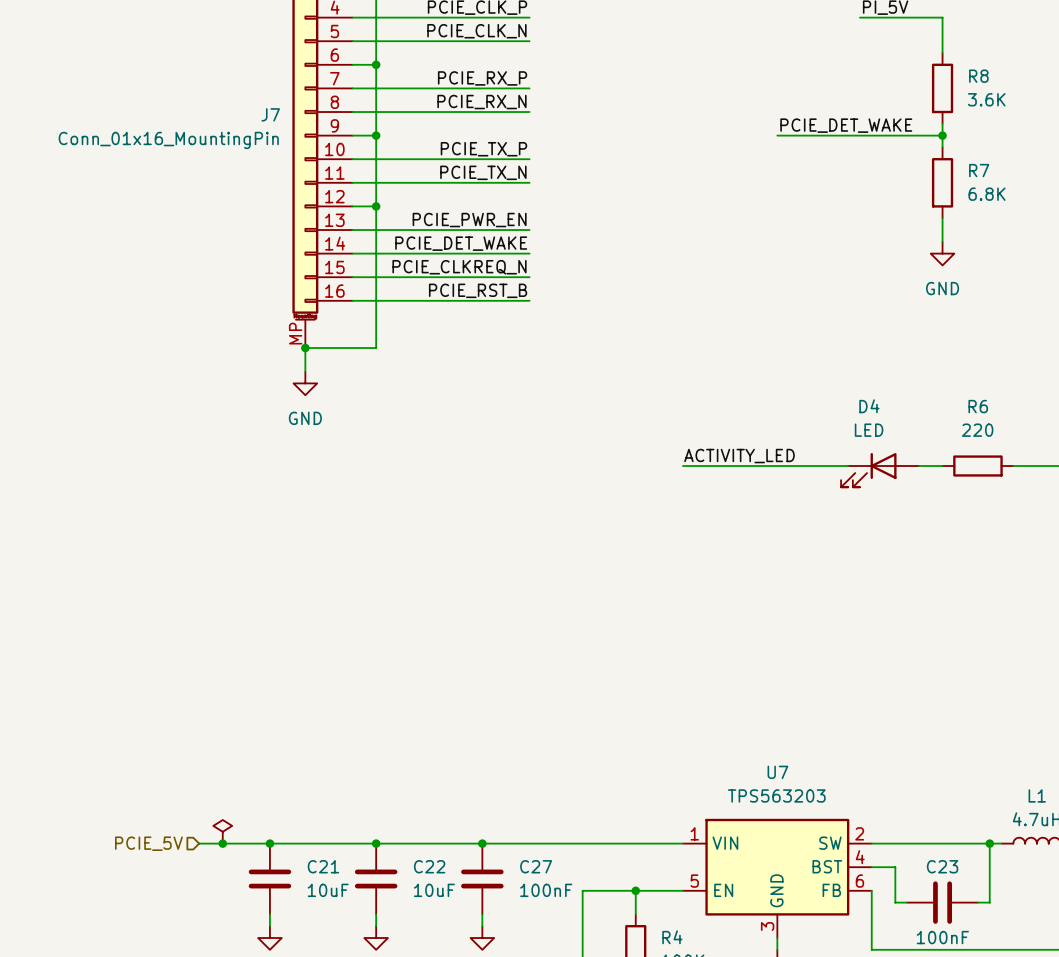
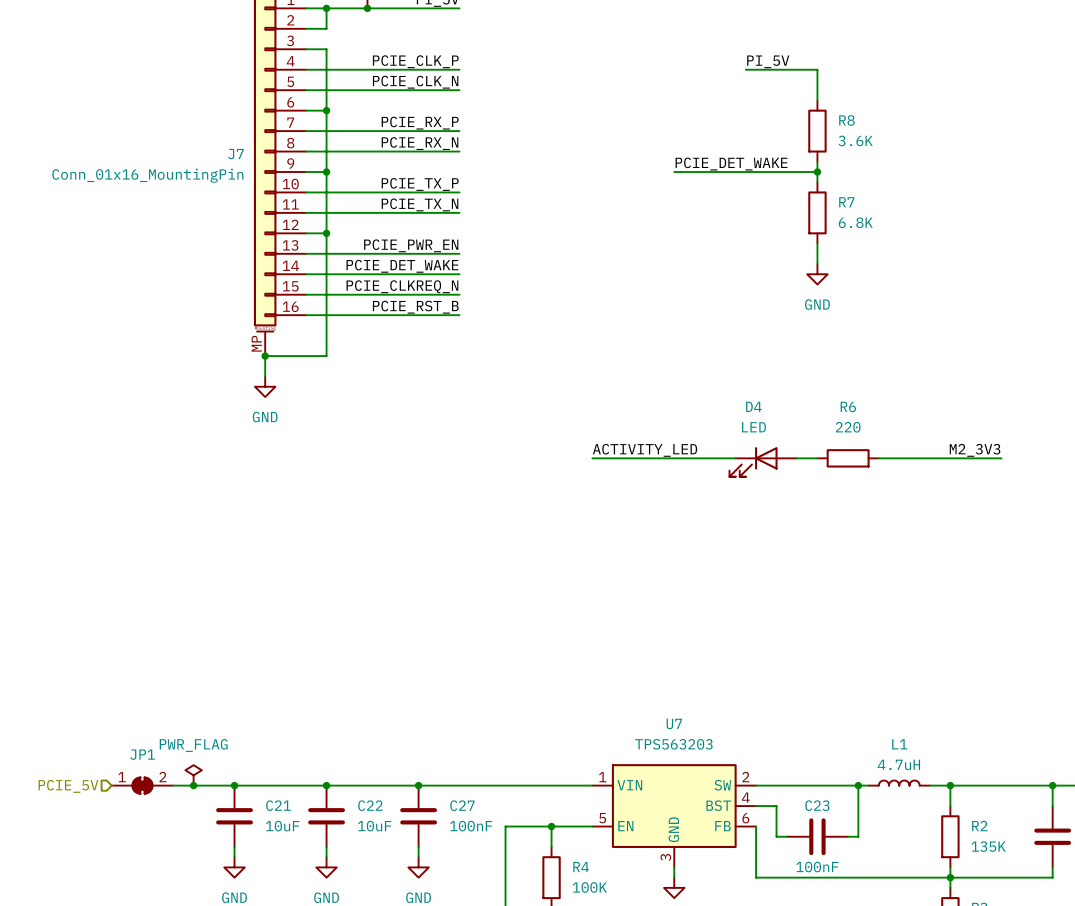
power symbol text: none -> PWR_FLAG (193, 745)
hierarchical label position: PCIE_5V (148, 843) -> PCIE_5V (68, 786)
JP1: none -> (142, 785)

